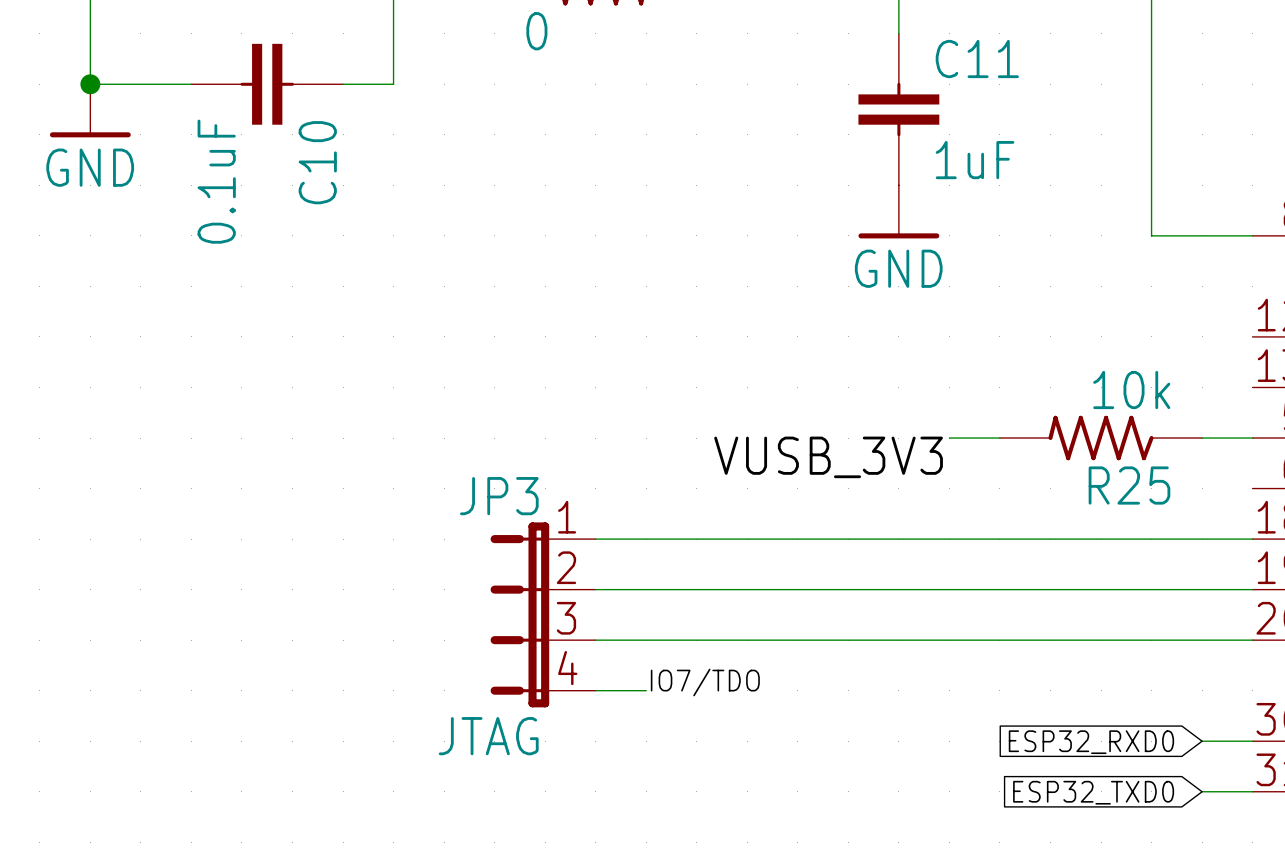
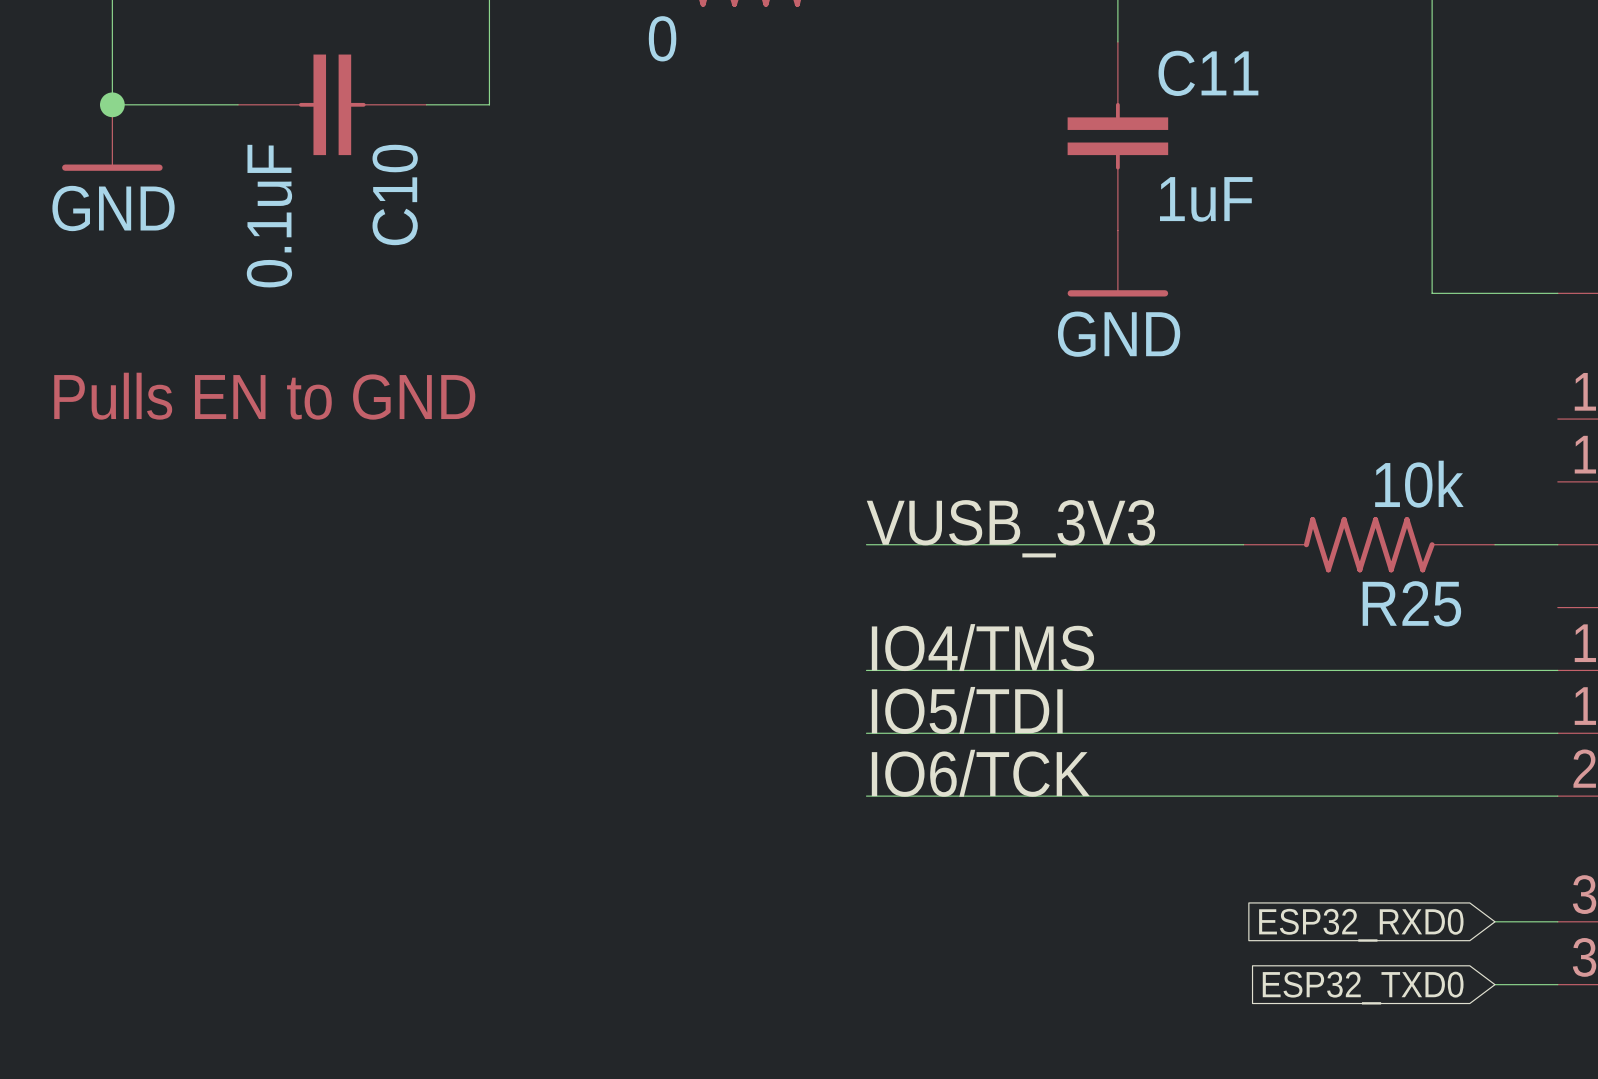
text: none -> Pulls EN to GND (264, 396)
wire: none -> (866, 544) (1180, 544)
label position: VUSB_3V3 (828, 457) -> VUSB_3V3 (1010, 528)
label: none -> IO4/TMS (982, 647)
wire: (595, 539) (696, 539) -> none
label: none -> IO5/TDI (967, 710)
wire: (595, 589) (696, 589) -> none
JP3: JTAG (543, 614) -> none
label: none -> IO6/TCK (980, 773)
wire: (595, 640) (696, 640) -> none
label: IO7/TDO (705, 682) -> none
wire: (595, 690) (646, 690) -> none

